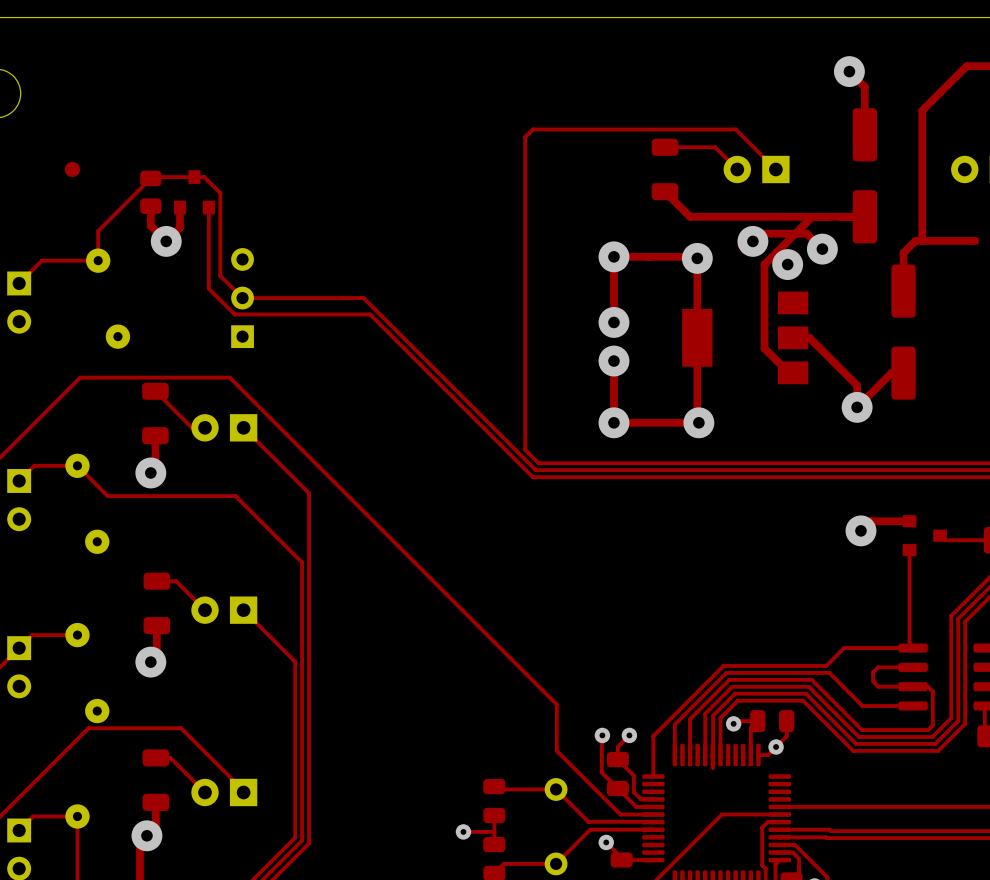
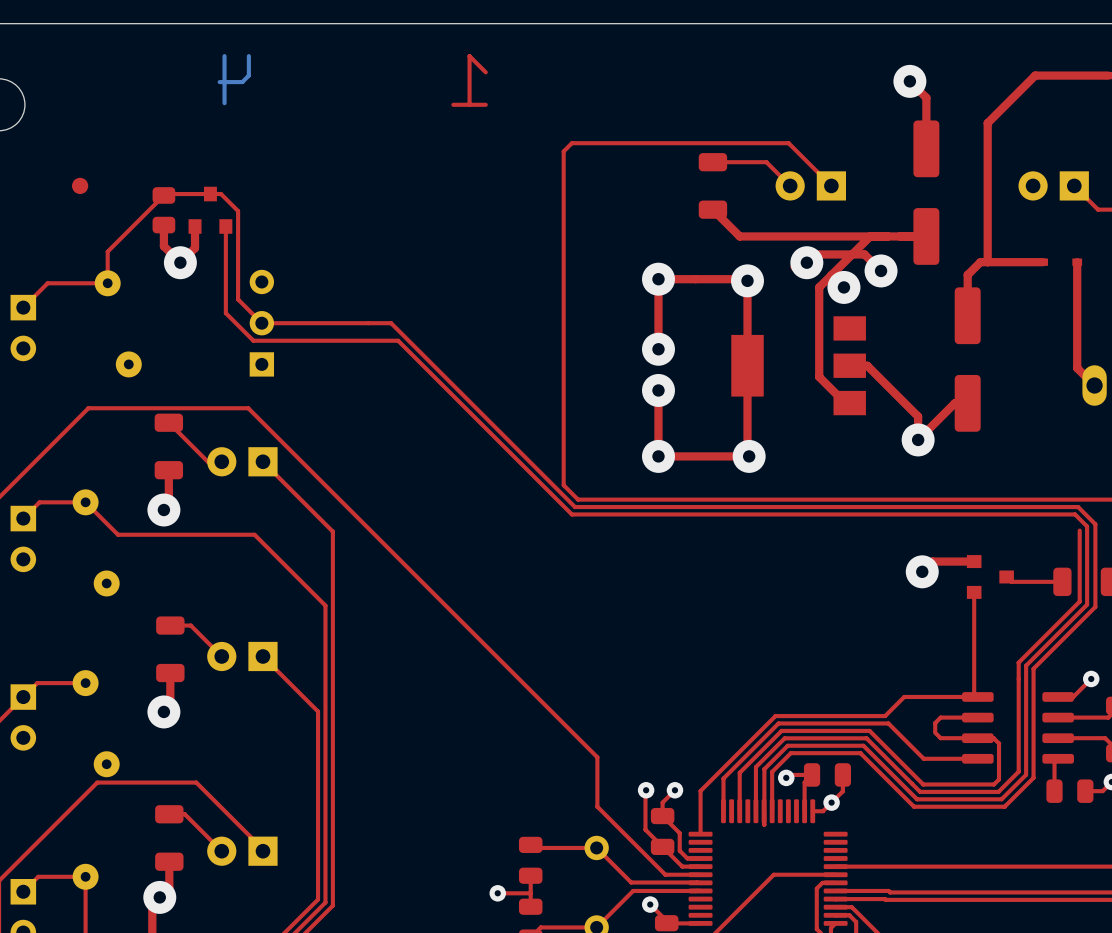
bottom track: none -> (224, 56) (224, 103)
bottom track: none -> (248, 56) (248, 75) (242, 82) (219, 82)
top track: none -> (485, 72) (469, 56) (469, 104)
top track: none -> (485, 104) (453, 104)

